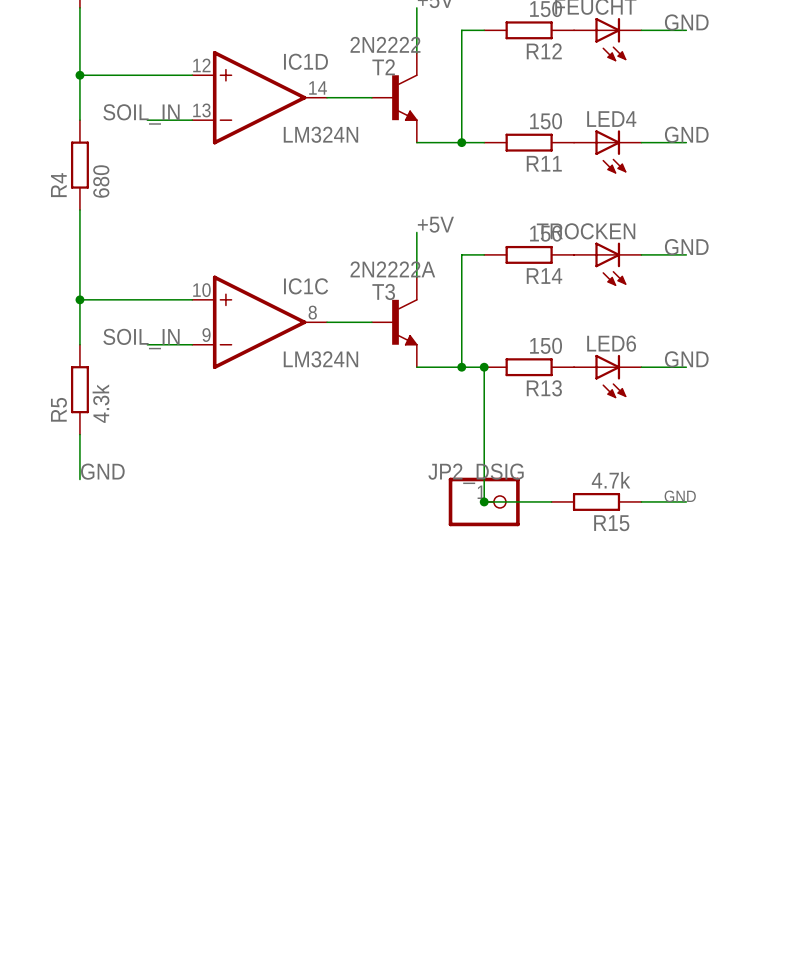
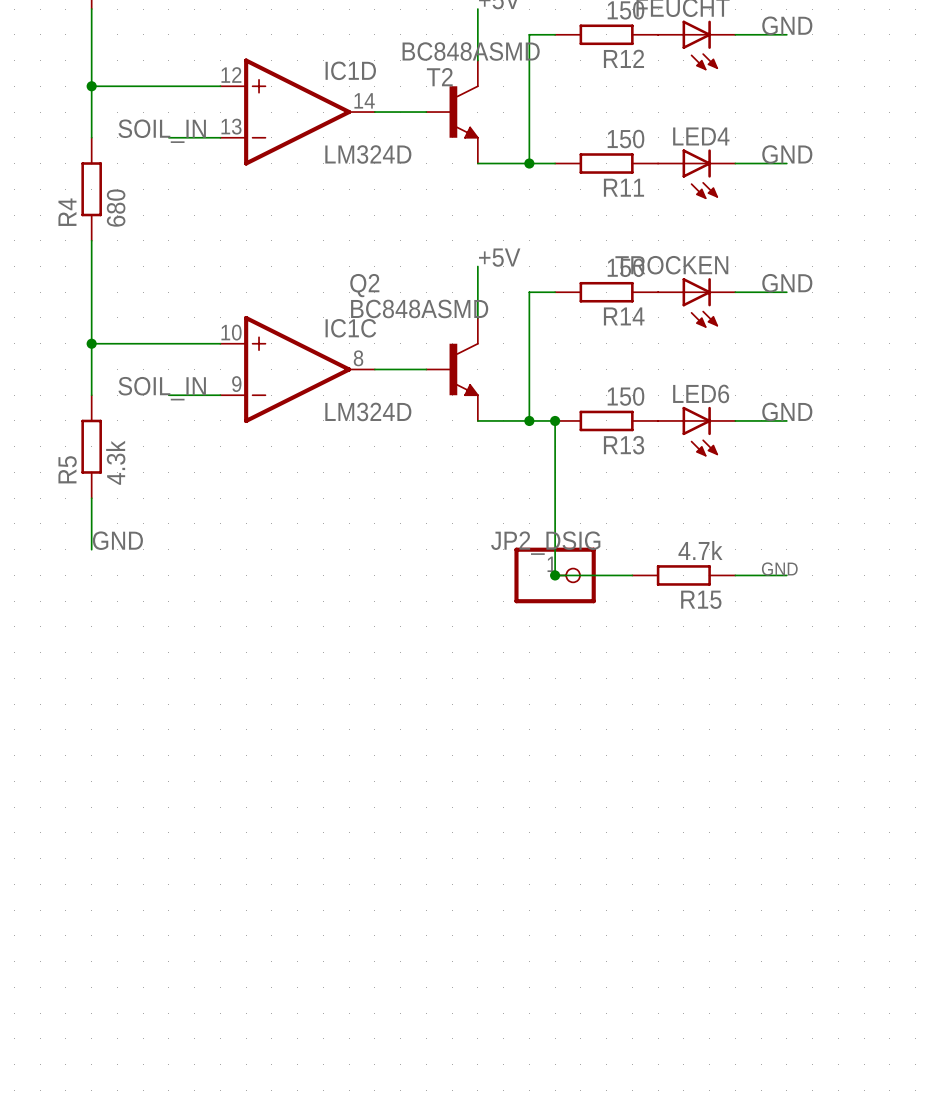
T2 value: 2N2222 (385, 44) -> BC848ASMD (471, 51)
IC1D value: LM324N (320, 134) -> LM324D (368, 154)
T3 value: 2N2222A (392, 269) -> BC848ASMD (419, 308)
T3 name: T3 (383, 291) -> Q2 (364, 285)
IC1C value: LM324N (320, 359) -> LM324D (368, 411)

